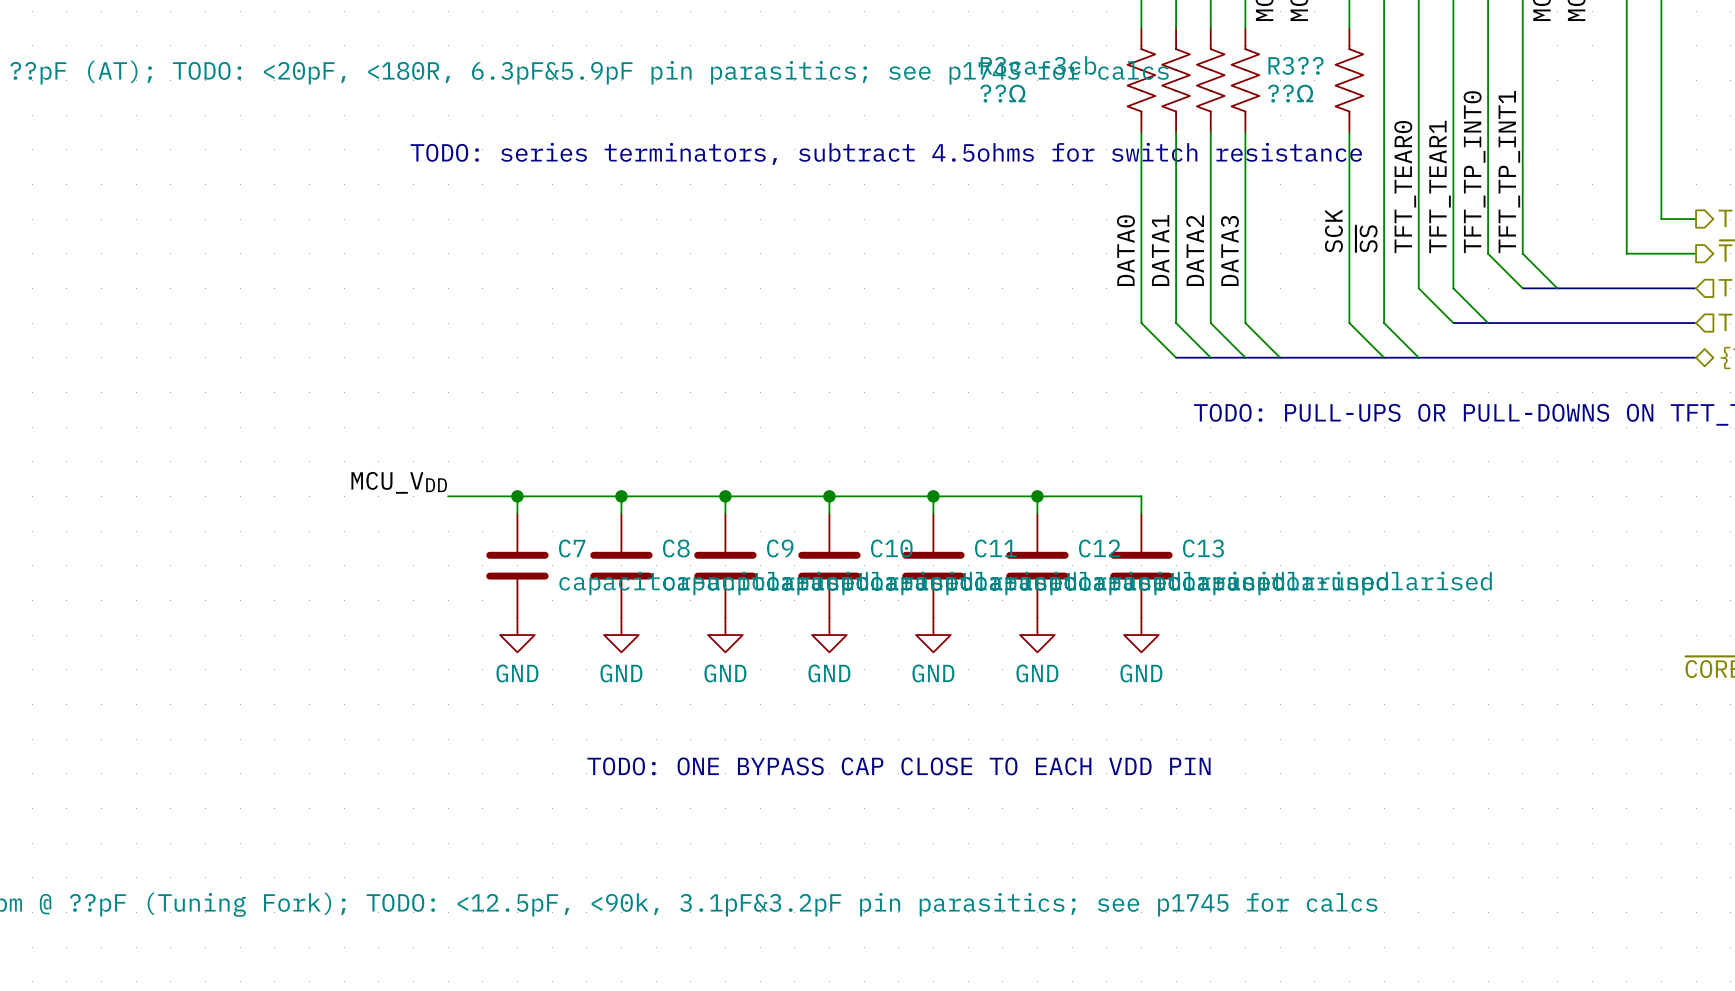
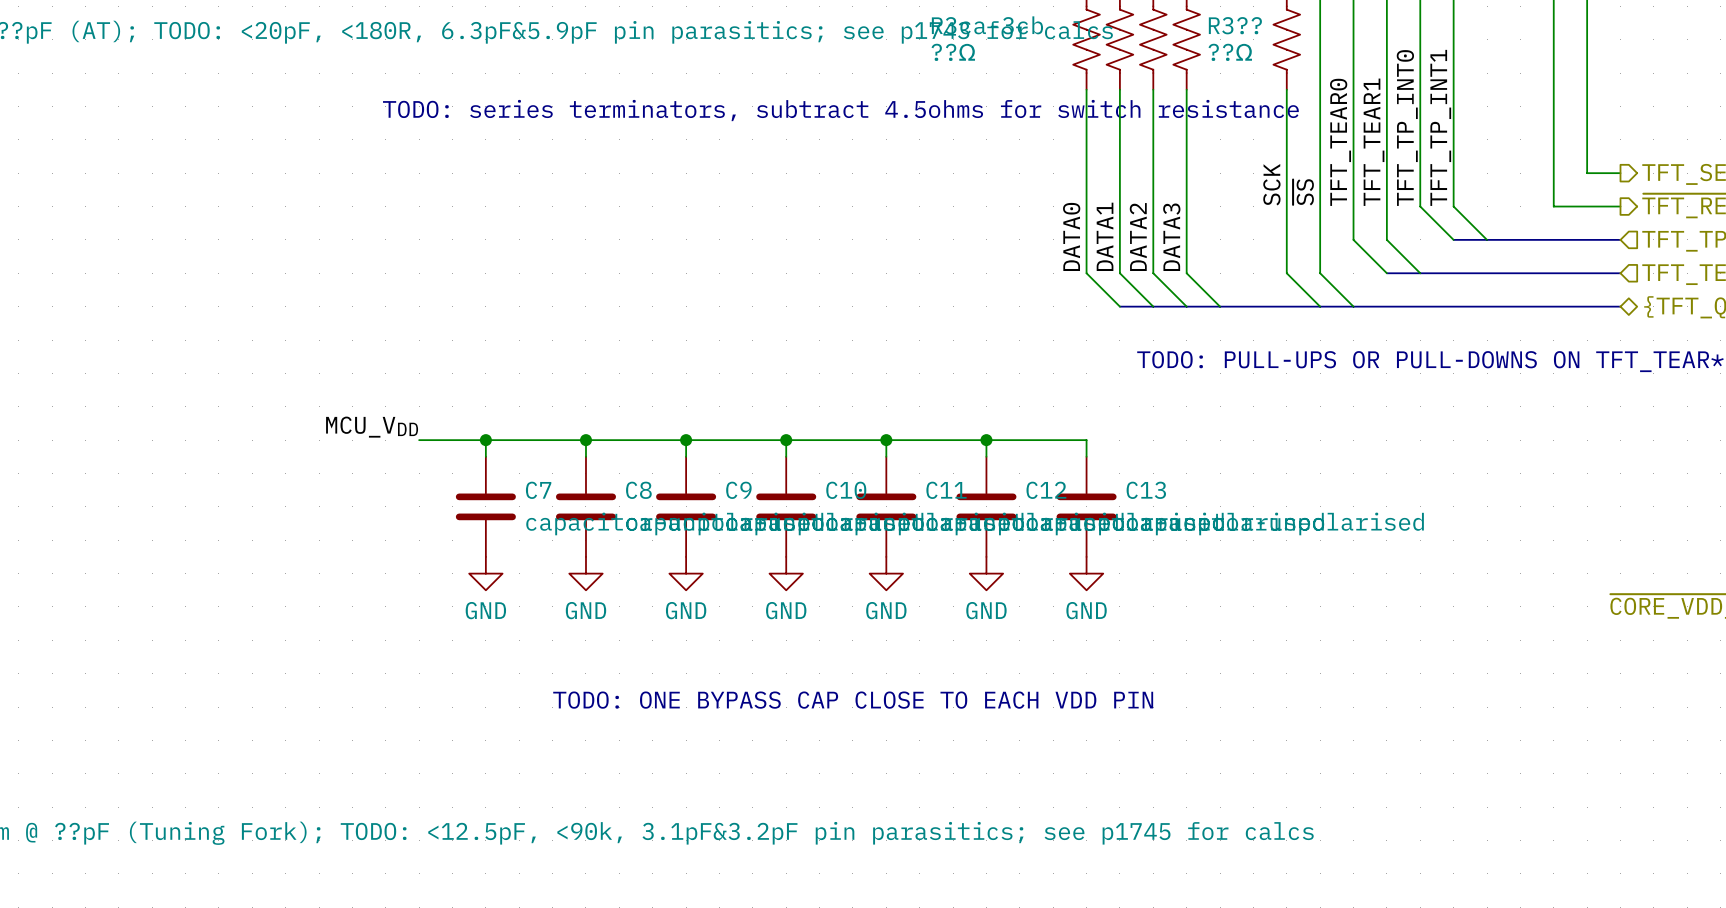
label position: DATA0 (1125, 250) -> DATA0 (1071, 236)
label position: DATA1 (1160, 250) -> DATA1 (1105, 236)
label position: DATA2 (1195, 250) -> DATA2 (1138, 237)
label position: DATA3 (1229, 250) -> DATA3 (1171, 237)

